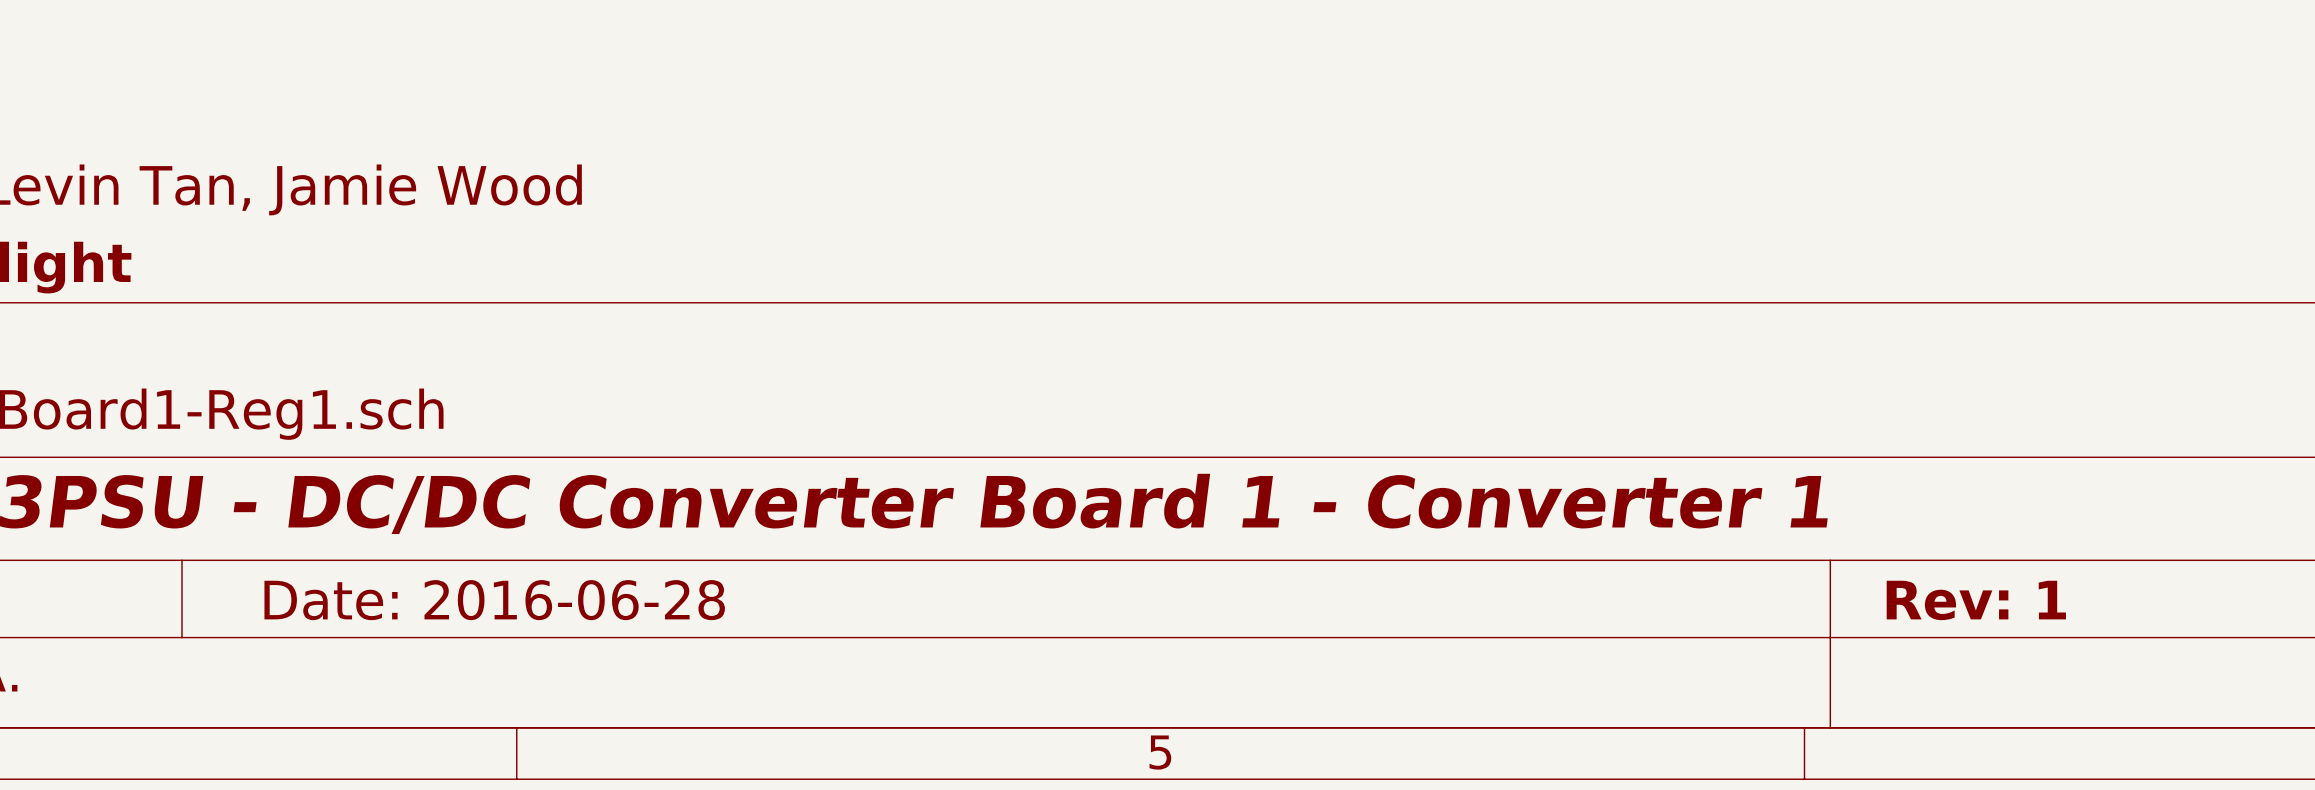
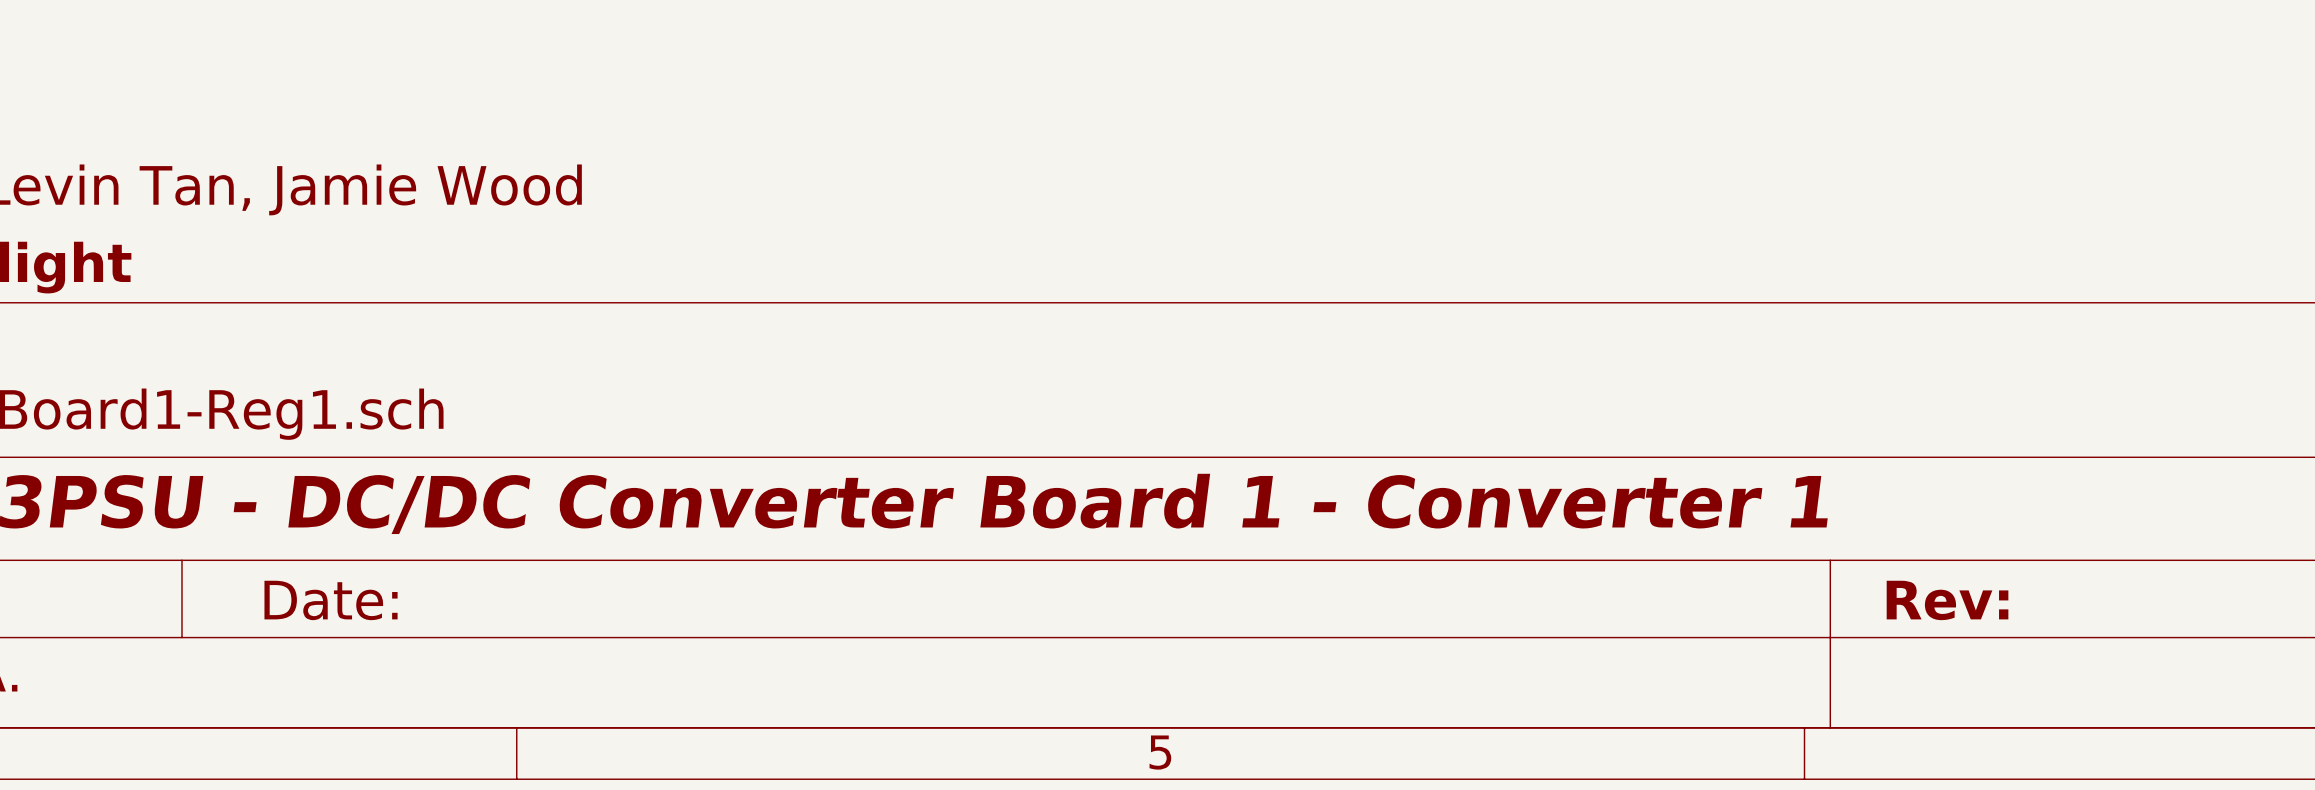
title block: Date: 2016-06-28 (494, 600) -> Date: (331, 600)
title block: Rev: 1 (1976, 600) -> Rev: (1947, 600)

